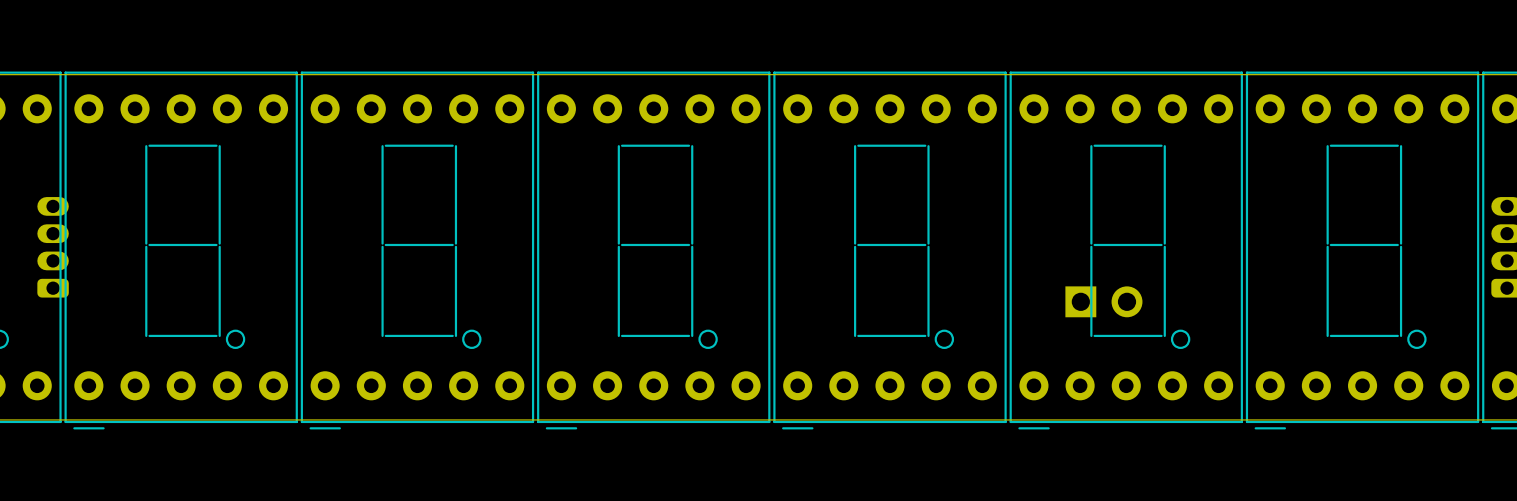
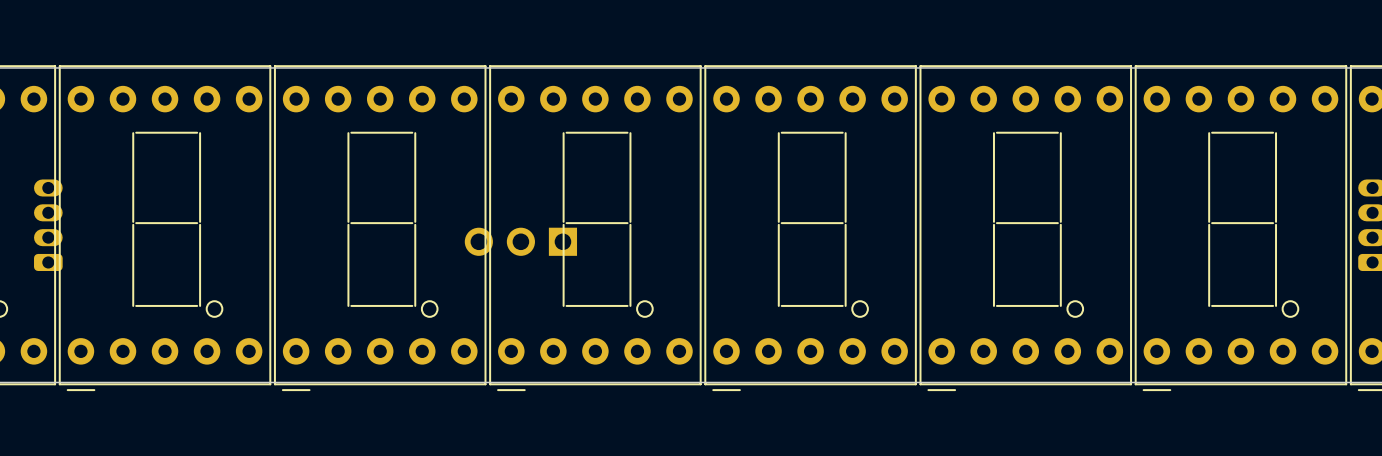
part: none -> (520, 241)
part: (1103, 301) -> none

